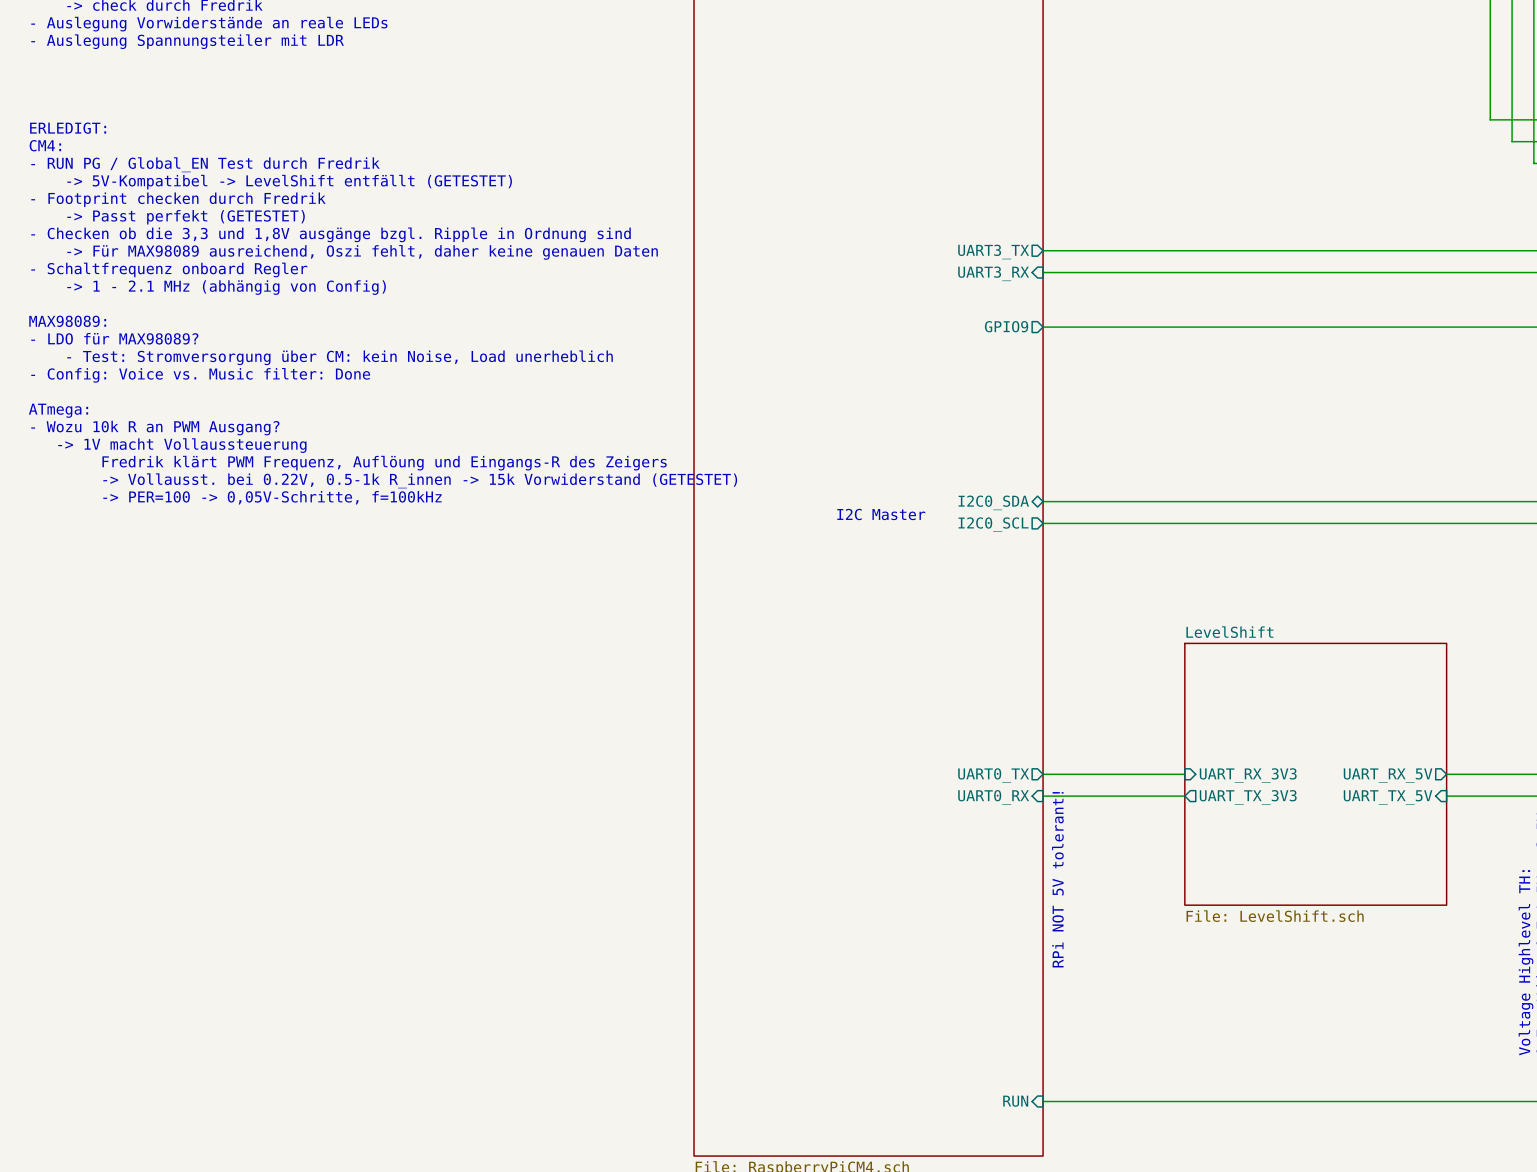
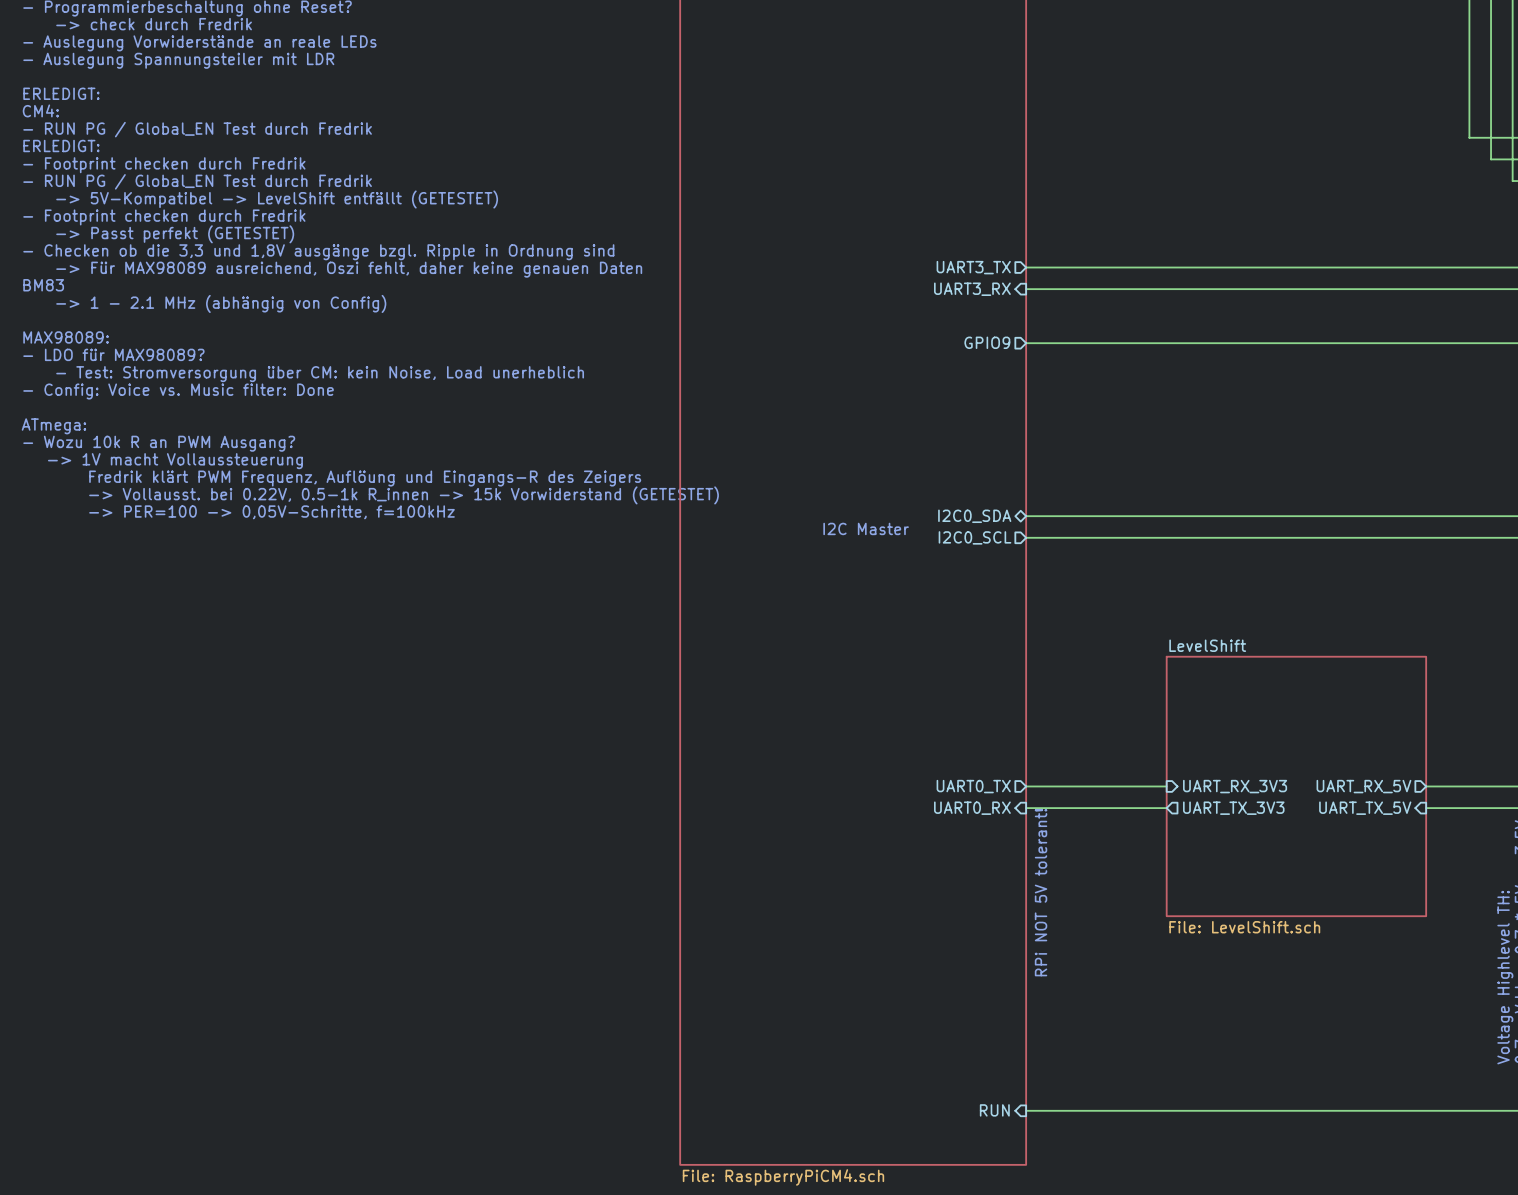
text: none -> ERLEDIGT: (61, 93)
text: none -> CM4: (40, 110)
text: none -> - RUN PG / Global_EN Test durch Fredrik (197, 129)
text: CM4: (45, 145) -> - Footprint checken durch Fredrik (164, 165)
text: - Schaltfrequenz onboard Regler (169, 269) -> BM83 (43, 285)

